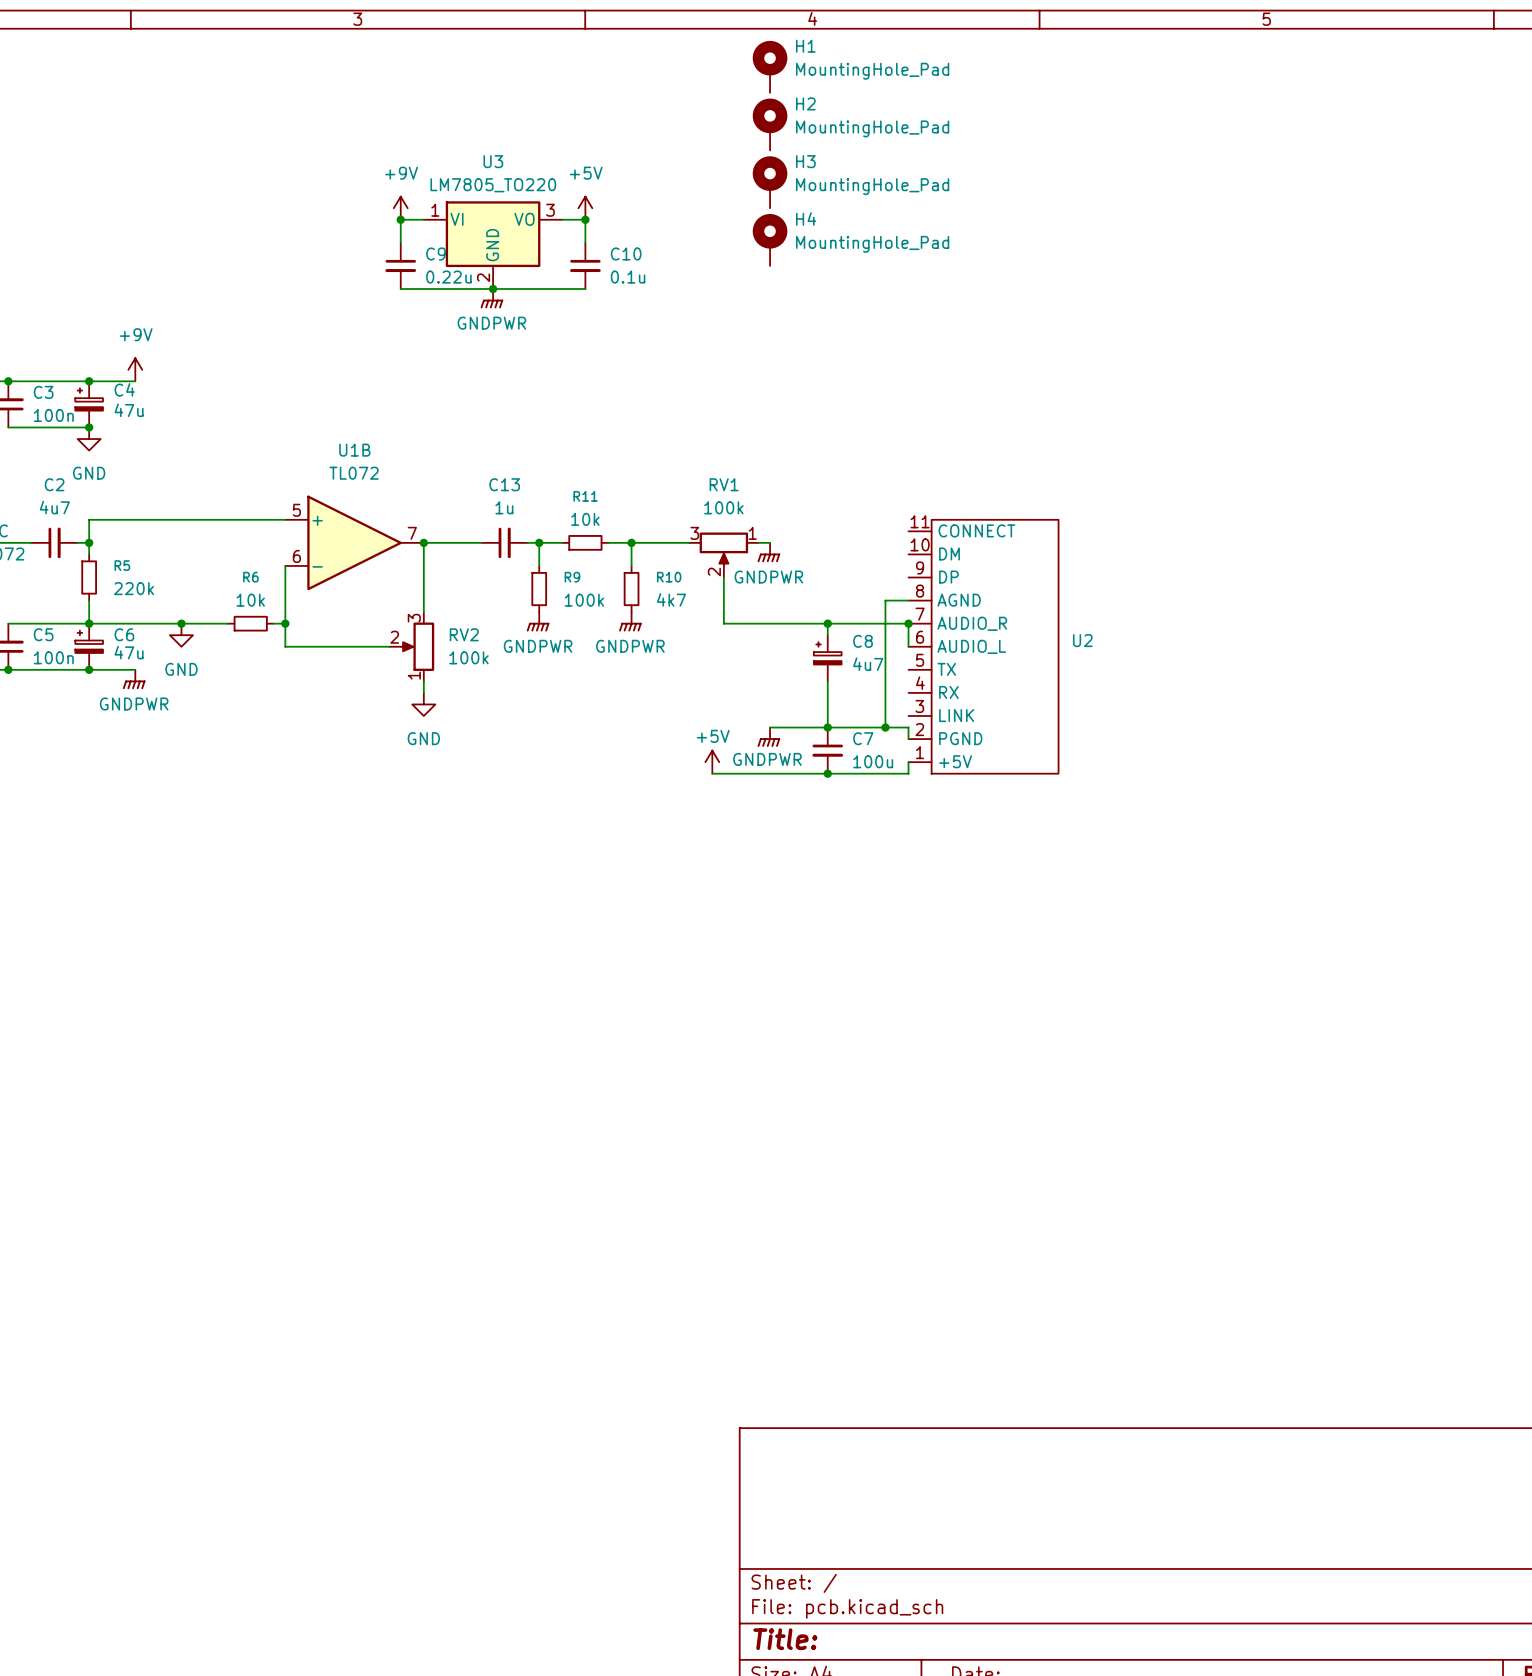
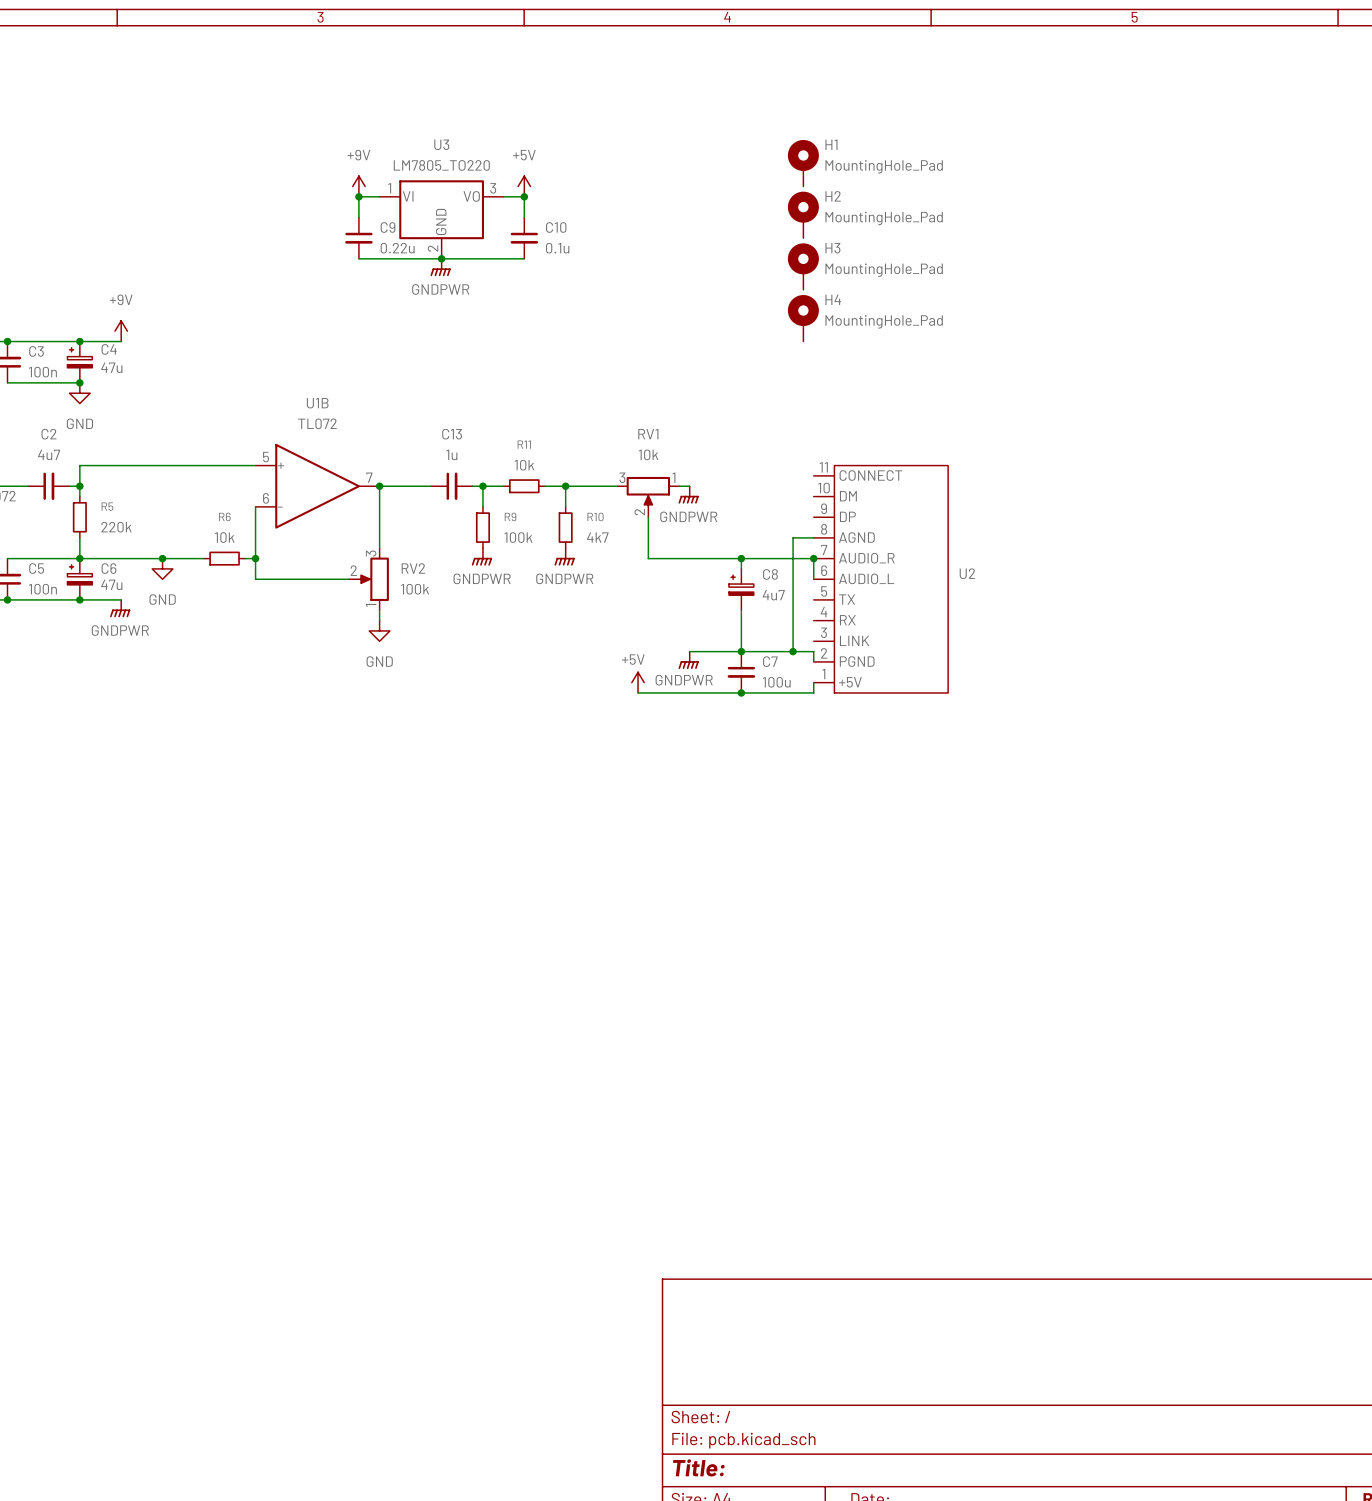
H1 position: (770, 66) -> (803, 163)
H2 position: (770, 124) -> (803, 214)
H3 position: (770, 182) -> (803, 266)
H4 position: (770, 239) -> (803, 318)
RV1 value: 100k (723, 507) -> 10k (648, 454)

